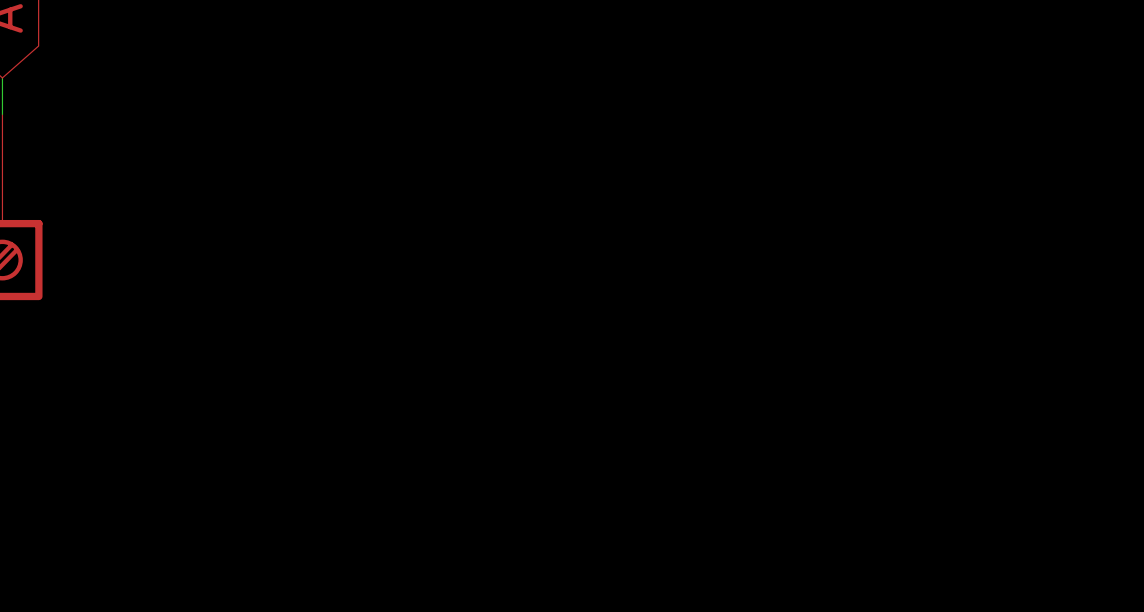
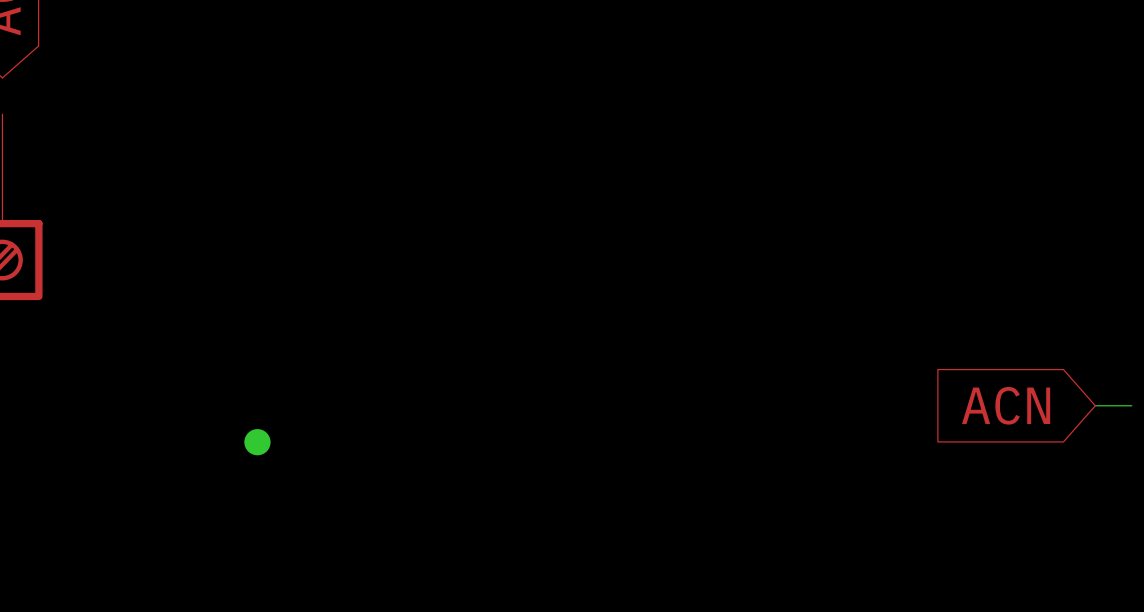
wire: (2, 77) (2, 114) -> none
global label: none -> ACN (1006, 405)
wire: none -> (1095, 405) (1131, 405)
junction: none -> (257, 442)

